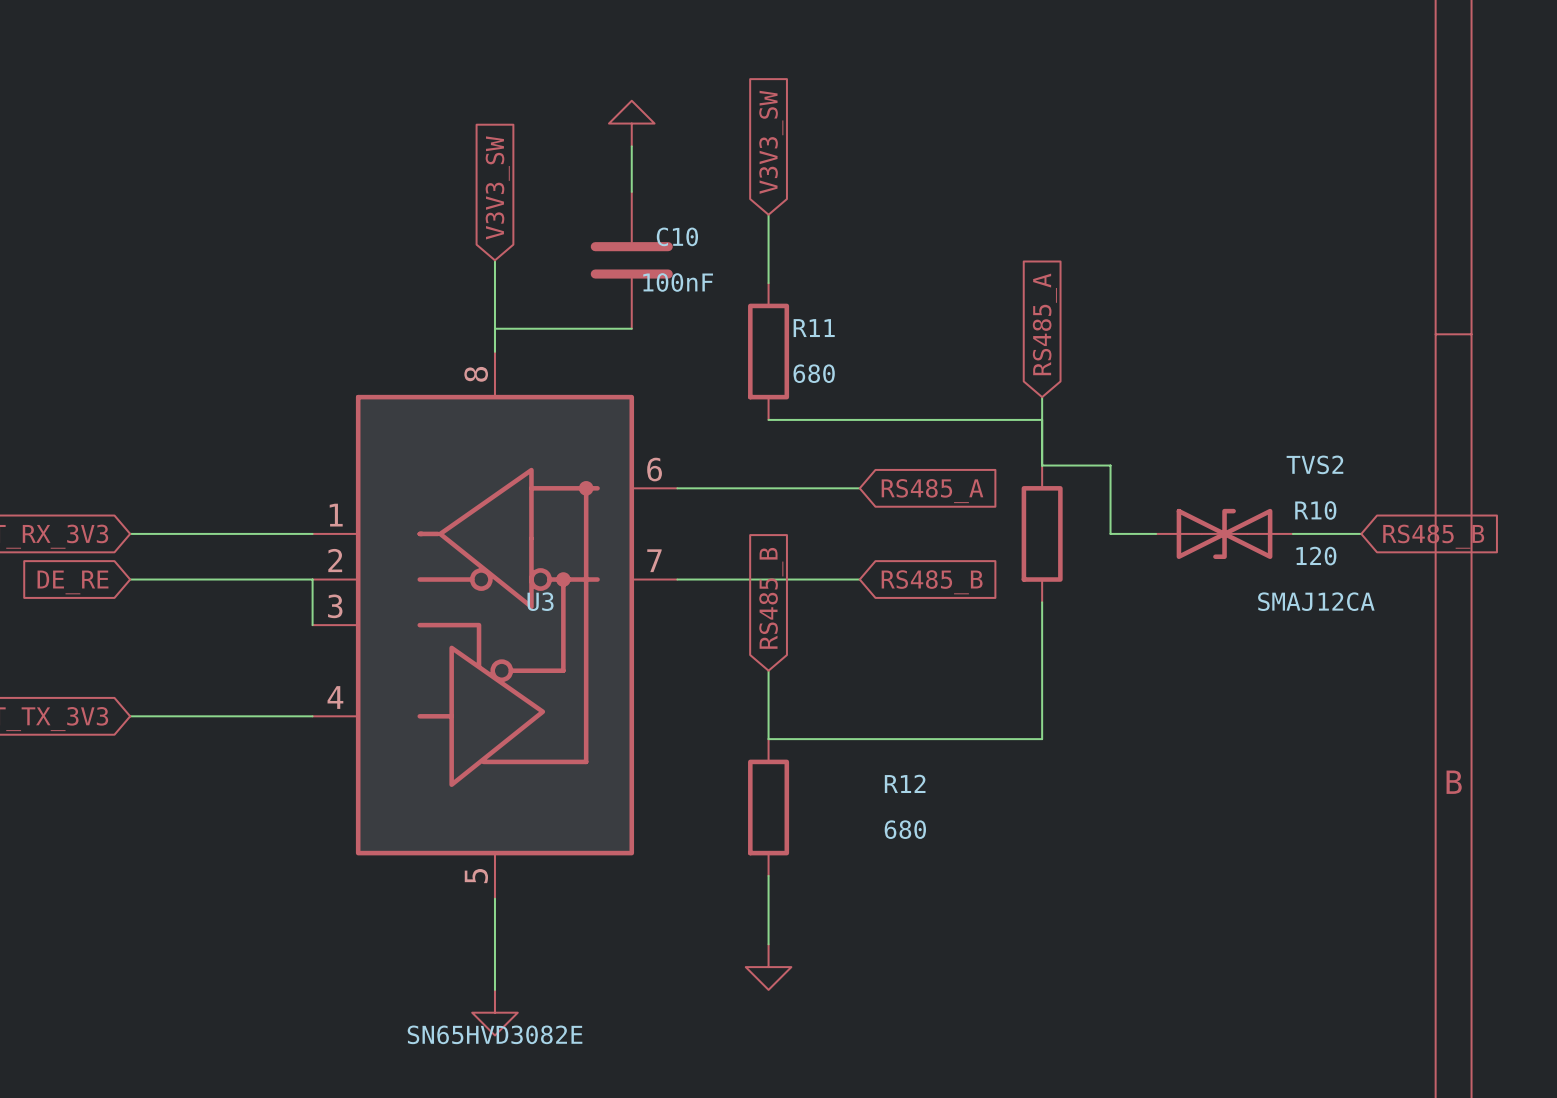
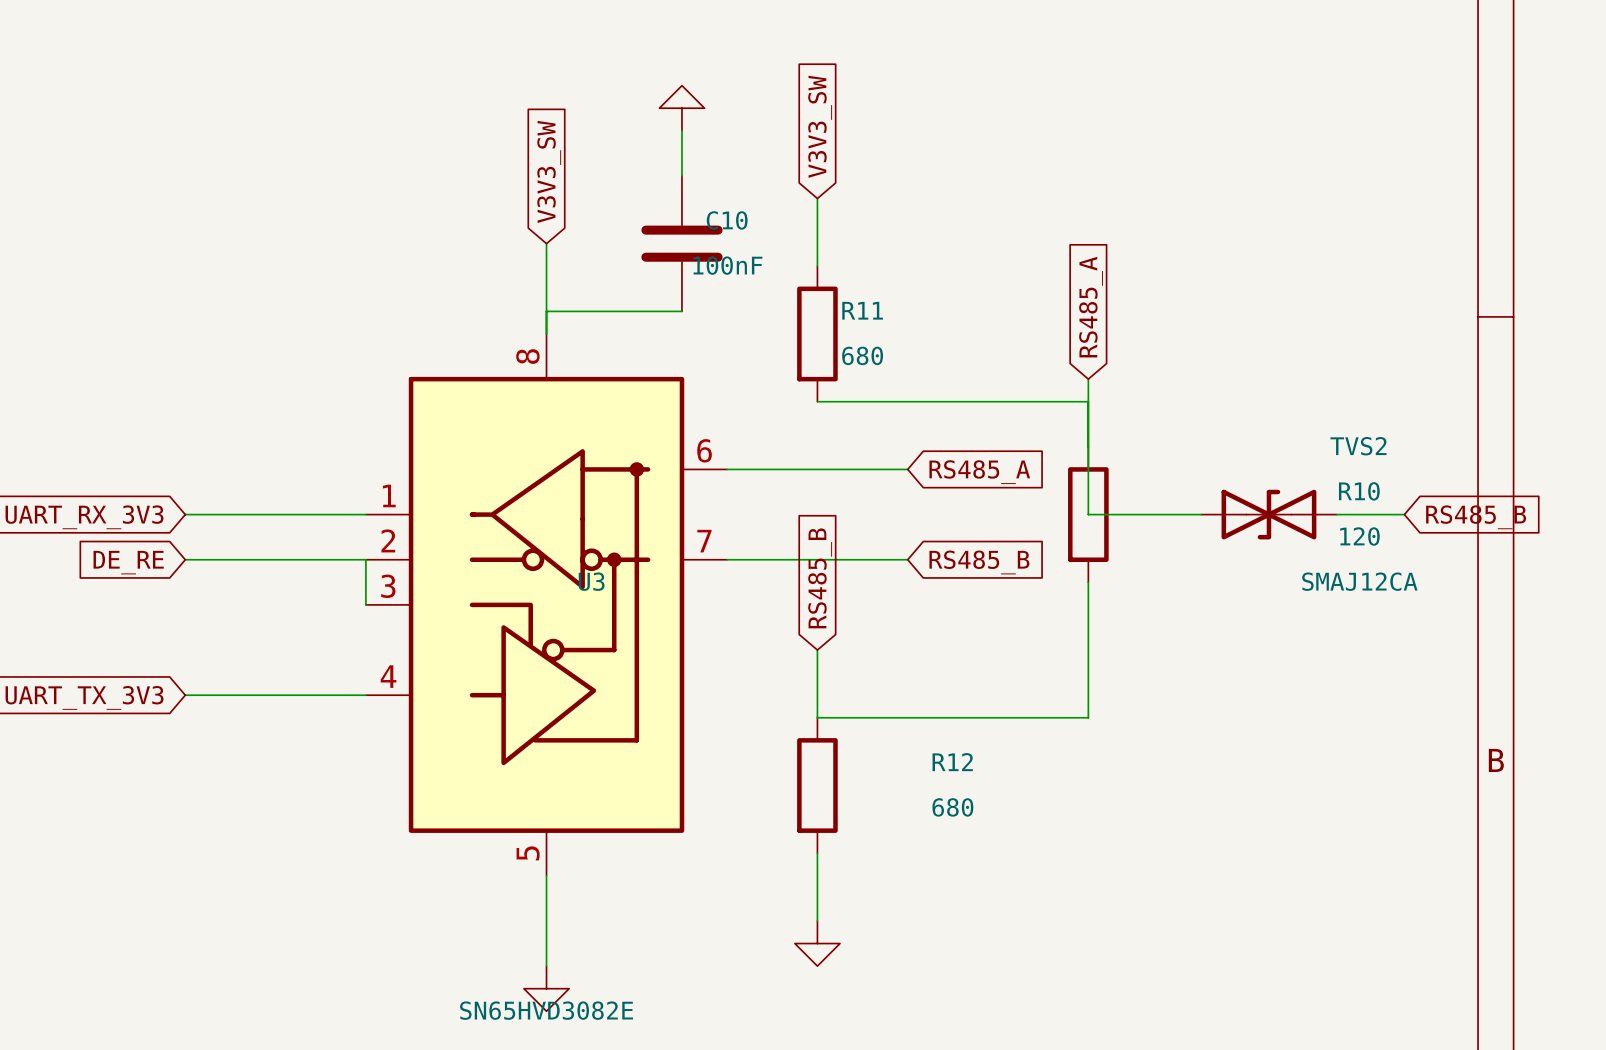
wire: (1042, 465) (1110, 465) (1110, 533) -> (1088, 446) (1088, 514) (1156, 514)

